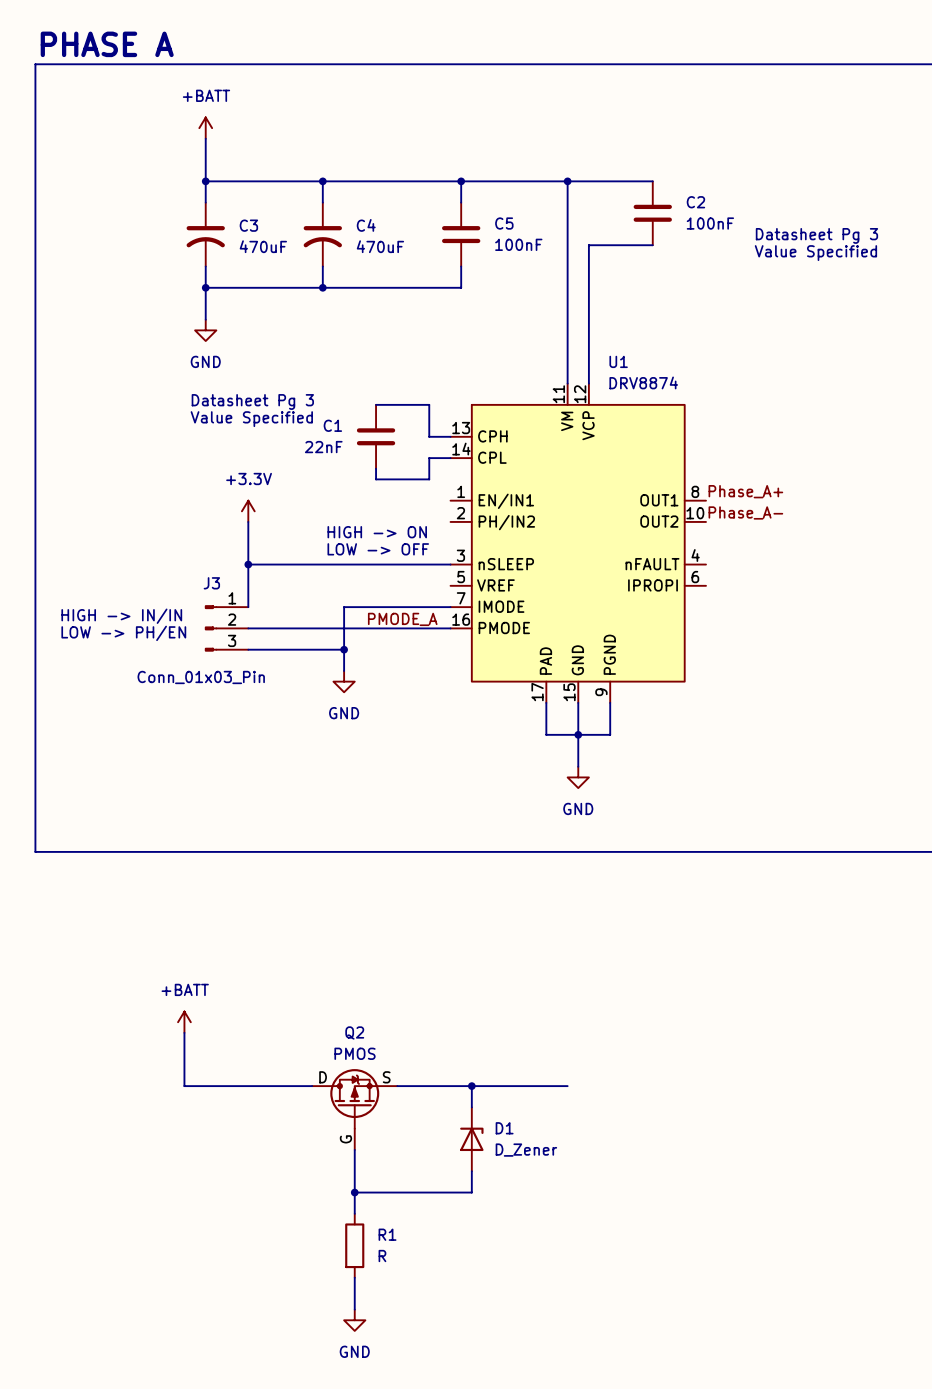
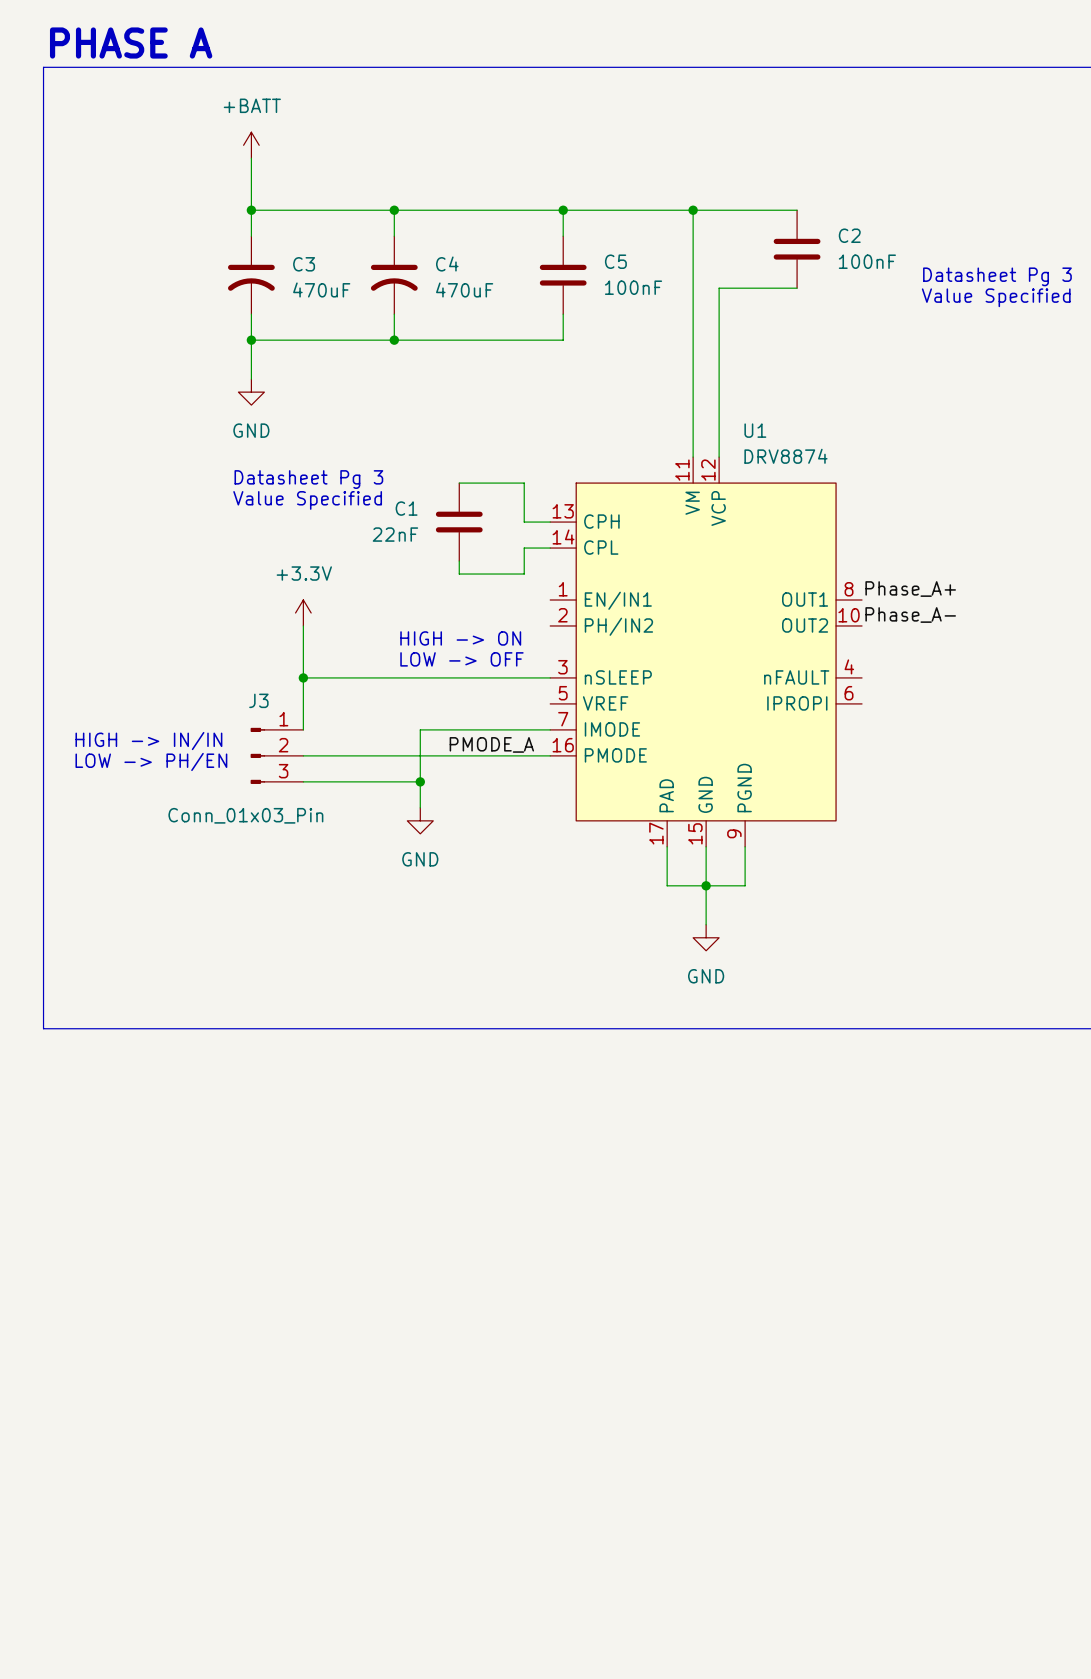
power symbol: +BATT (184, 1022) -> none
wire: (184, 1032) (184, 1086) (312, 1086) -> none
wire: (397, 1086) (567, 1086) -> none
wire: (471, 1086) (471, 1107) -> none
junction: (471, 1086) -> none
Q2: PMOS (354, 1109) -> none
D1: D_Zener (471, 1139) -> none
wire: (354, 1149) (354, 1213) -> none
wire: (471, 1171) (471, 1192) (354, 1192) -> none
junction: (354, 1192) -> none
R1: R (354, 1245) -> none
wire: (354, 1277) (354, 1309) -> none
power symbol: GND (354, 1320) -> none

